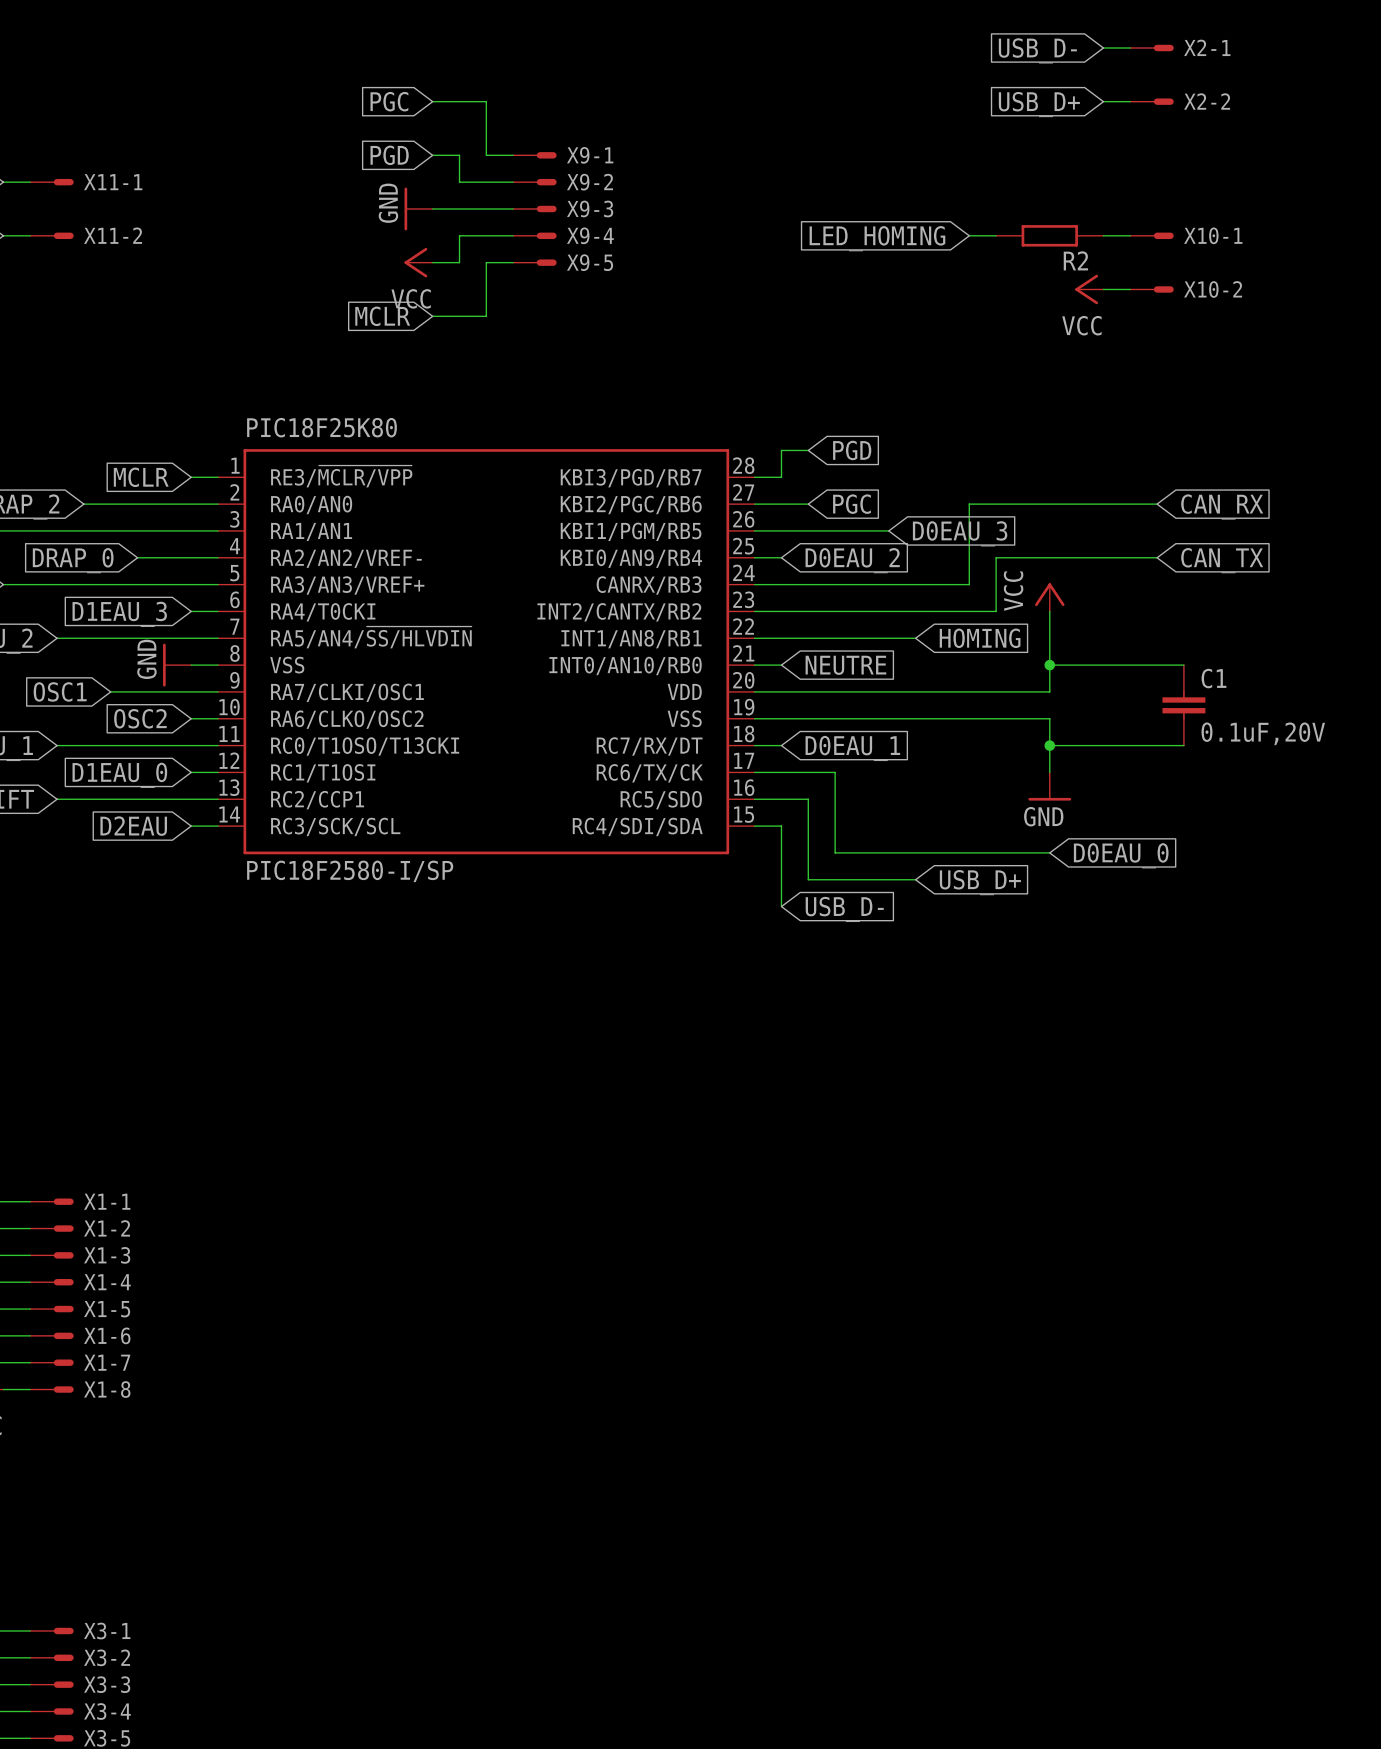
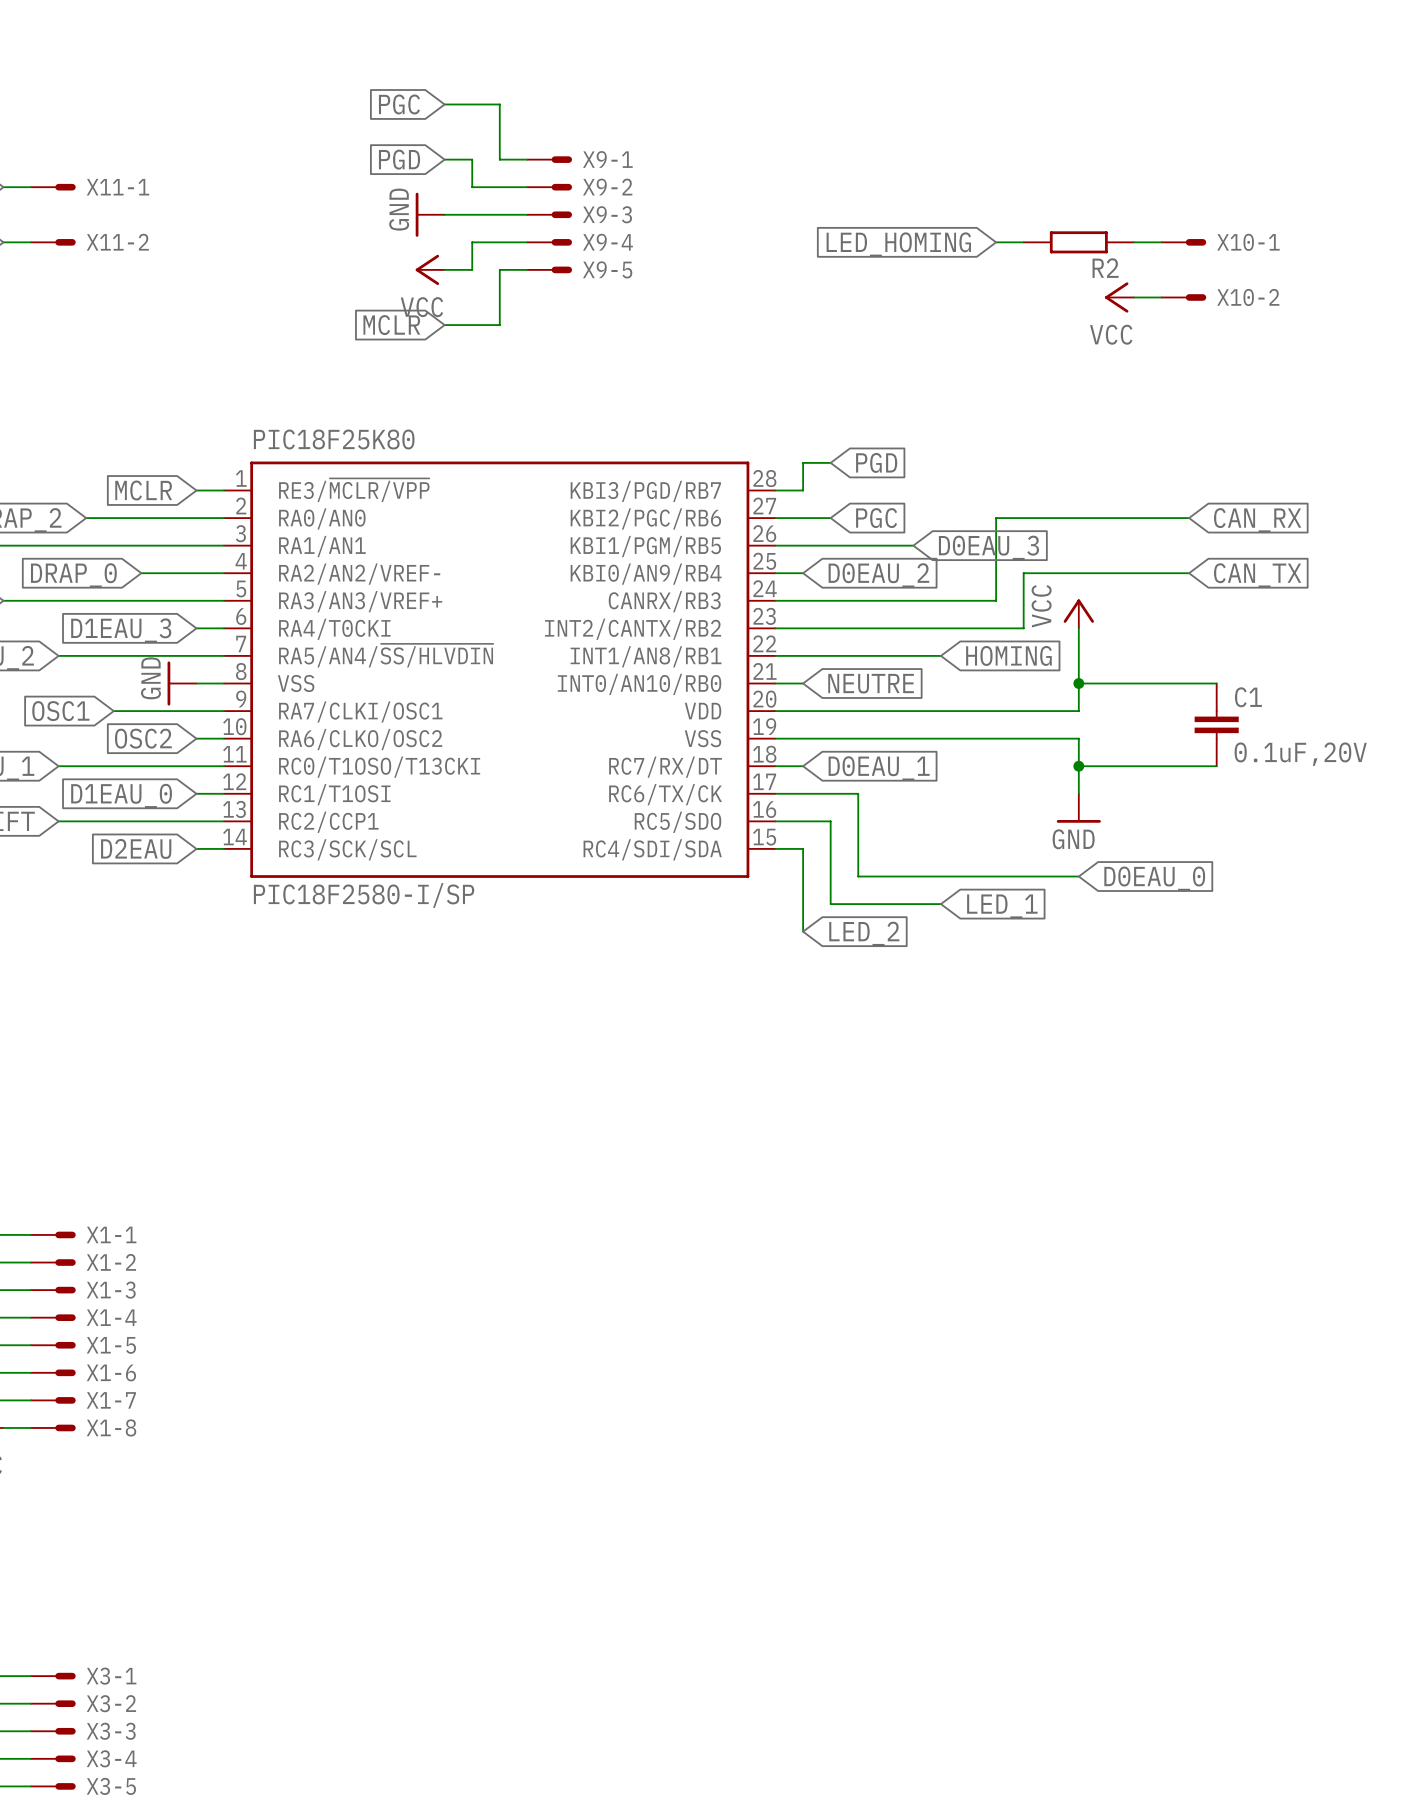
wire: (1103, 48) (1130, 48) -> none
X2-1: (1152, 48) -> none
global label: USB_D- (1037, 50) -> none
wire: (1103, 101) (1130, 101) -> none
X2-2: (1152, 101) -> none
global label: USB_D+ (1039, 104) -> none
global label: USB_D+ (980, 882) -> LED_1 (1002, 906)
global label: USB_D- (844, 909) -> LED_2 (864, 933)

